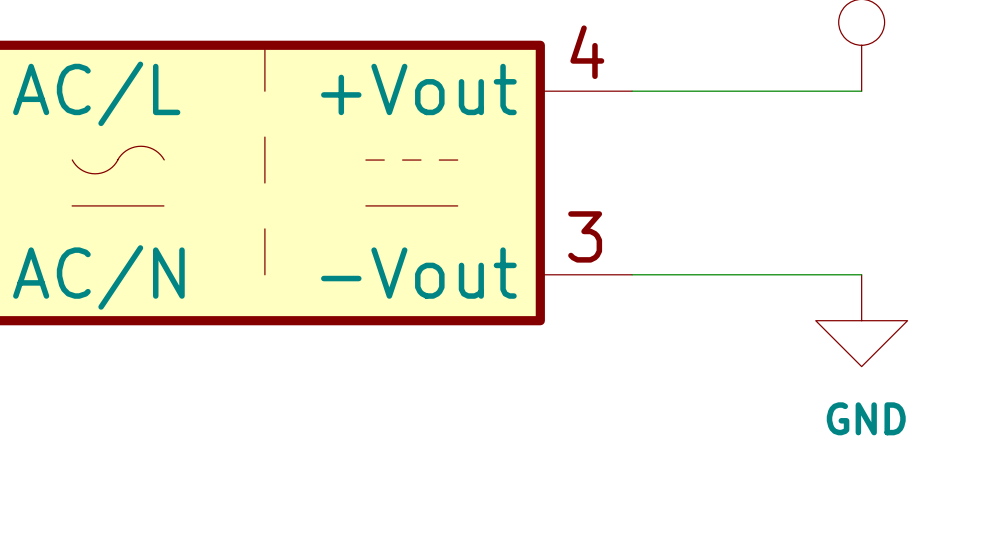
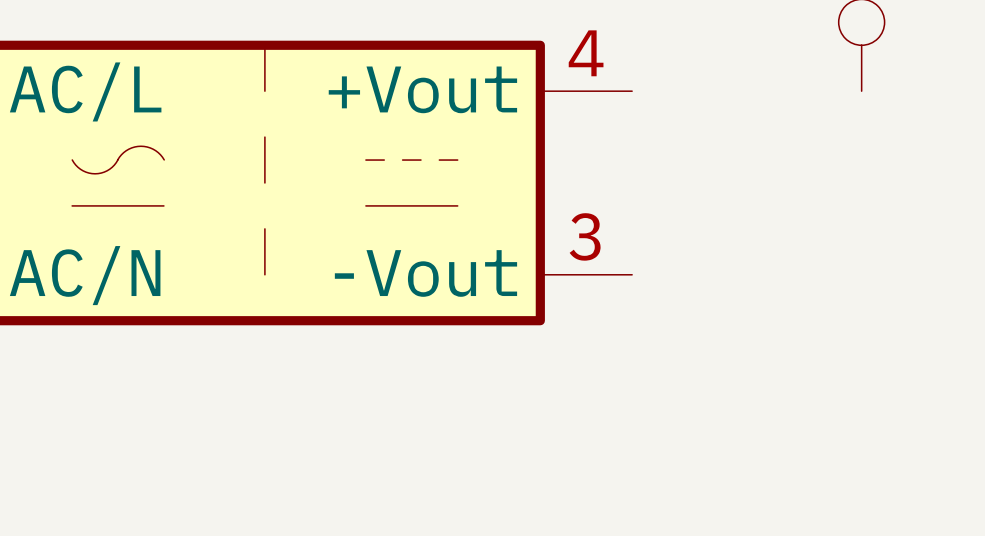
wire: (632, 91) (861, 91) -> none
wire: (632, 274) (861, 274) -> none
power symbol: GND (861, 320) -> none

